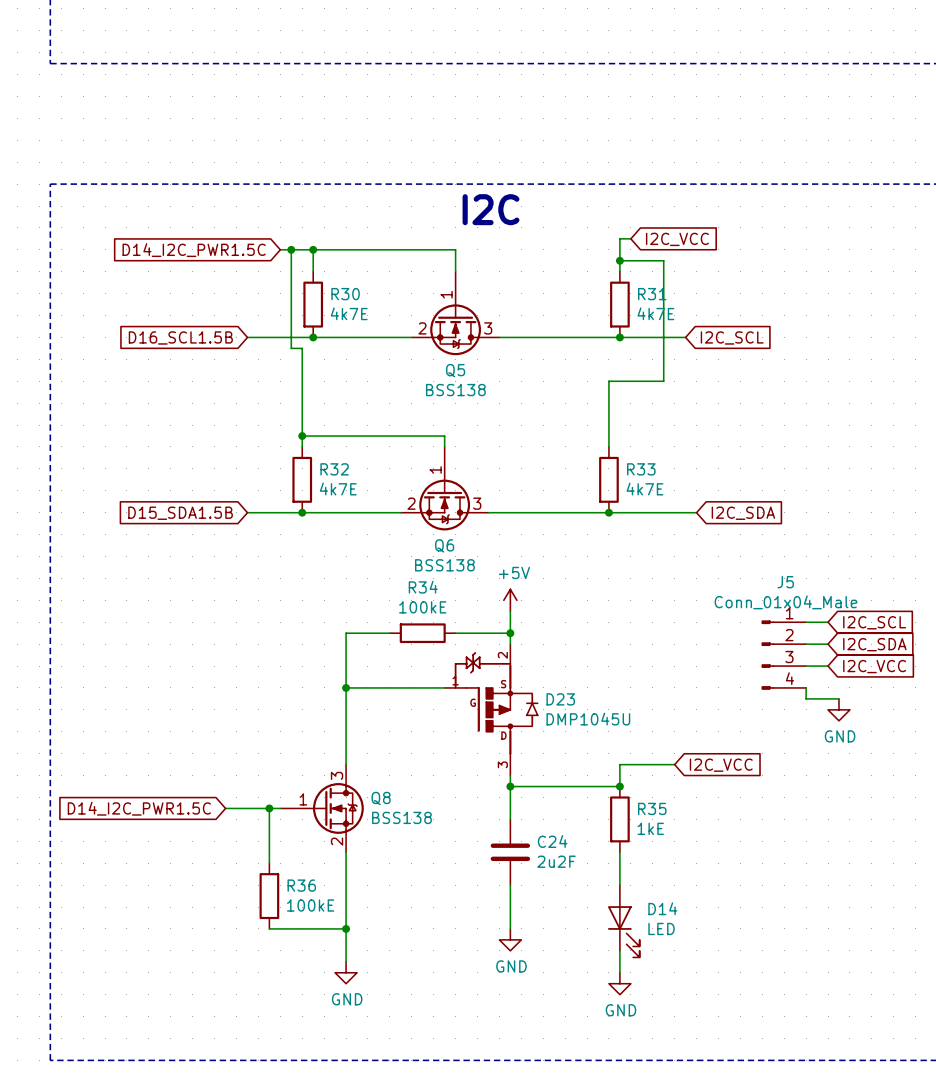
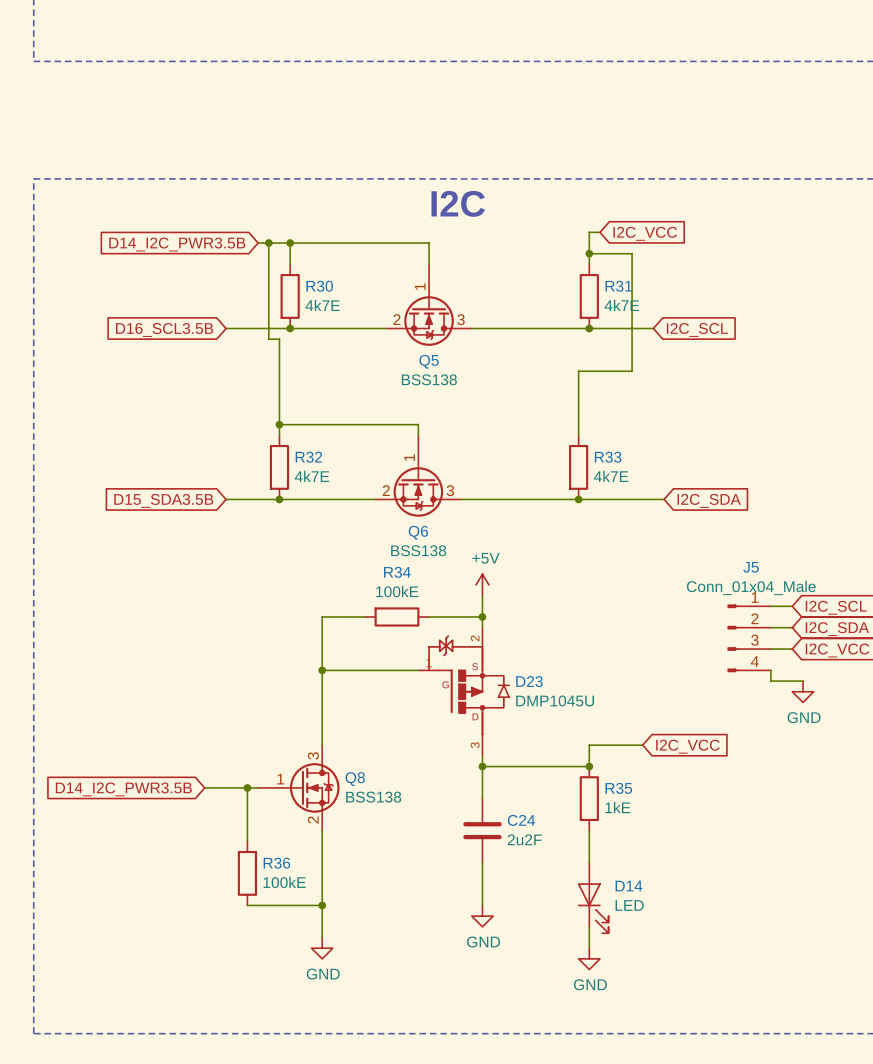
global label: D14_I2C_PWR1.5C (194, 250) -> D14_I2C_PWR3.5B (177, 244)
global label: D16_SCL1.5B (180, 337) -> D16_SCL3.5B (164, 329)
global label: D15_SDA1.5B (180, 513) -> D15_SDA3.5B (163, 500)
global label: D14_I2C_PWR1.5C (139, 808) -> D14_I2C_PWR3.5B (123, 789)

